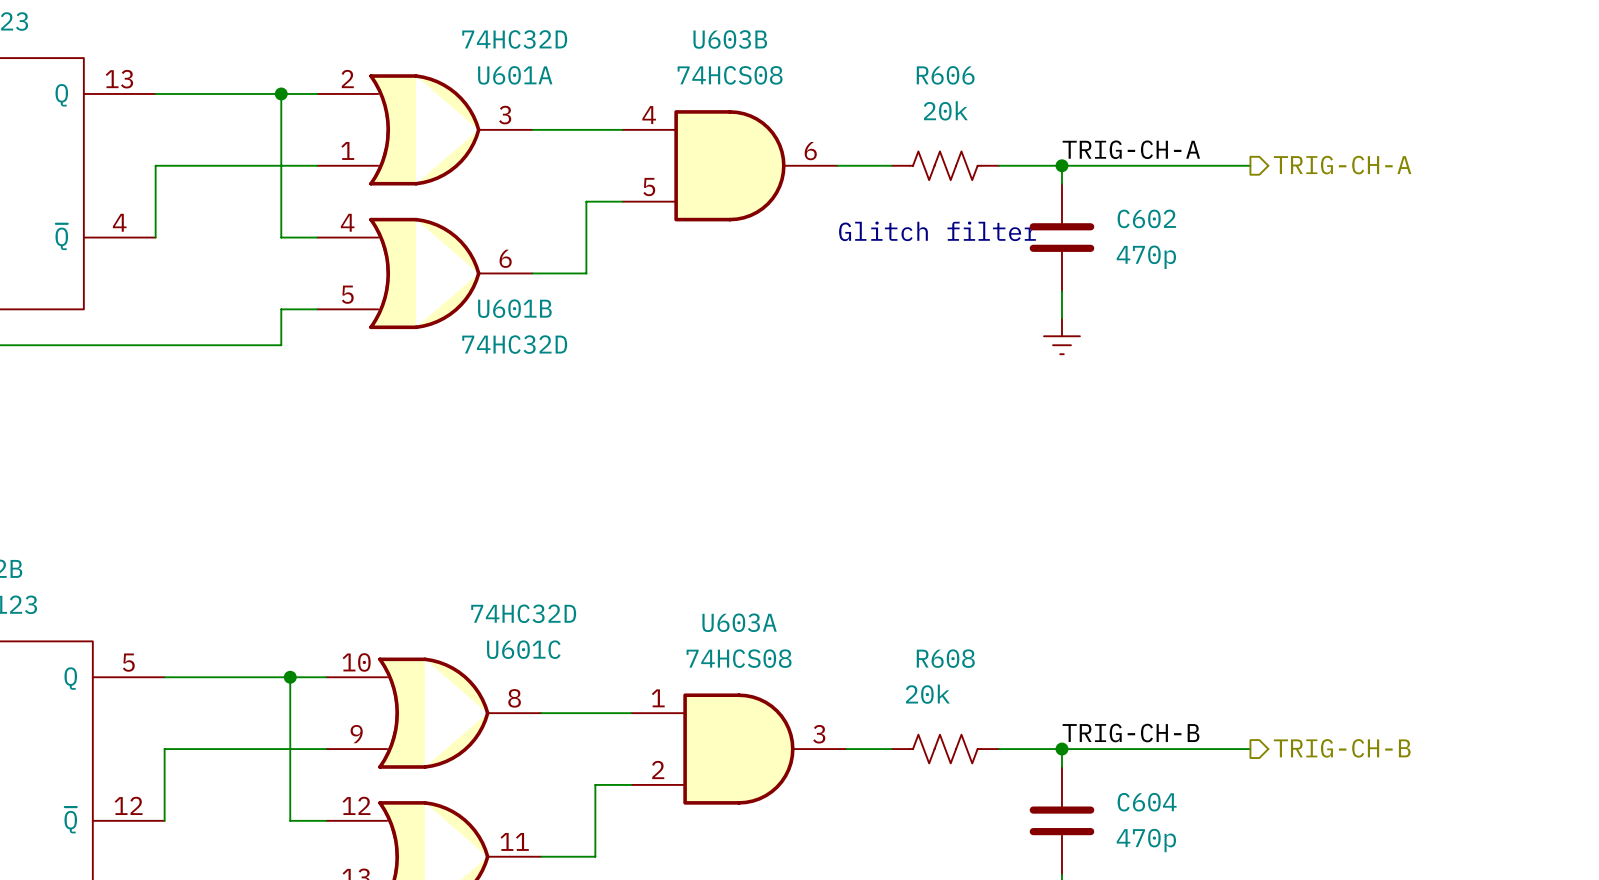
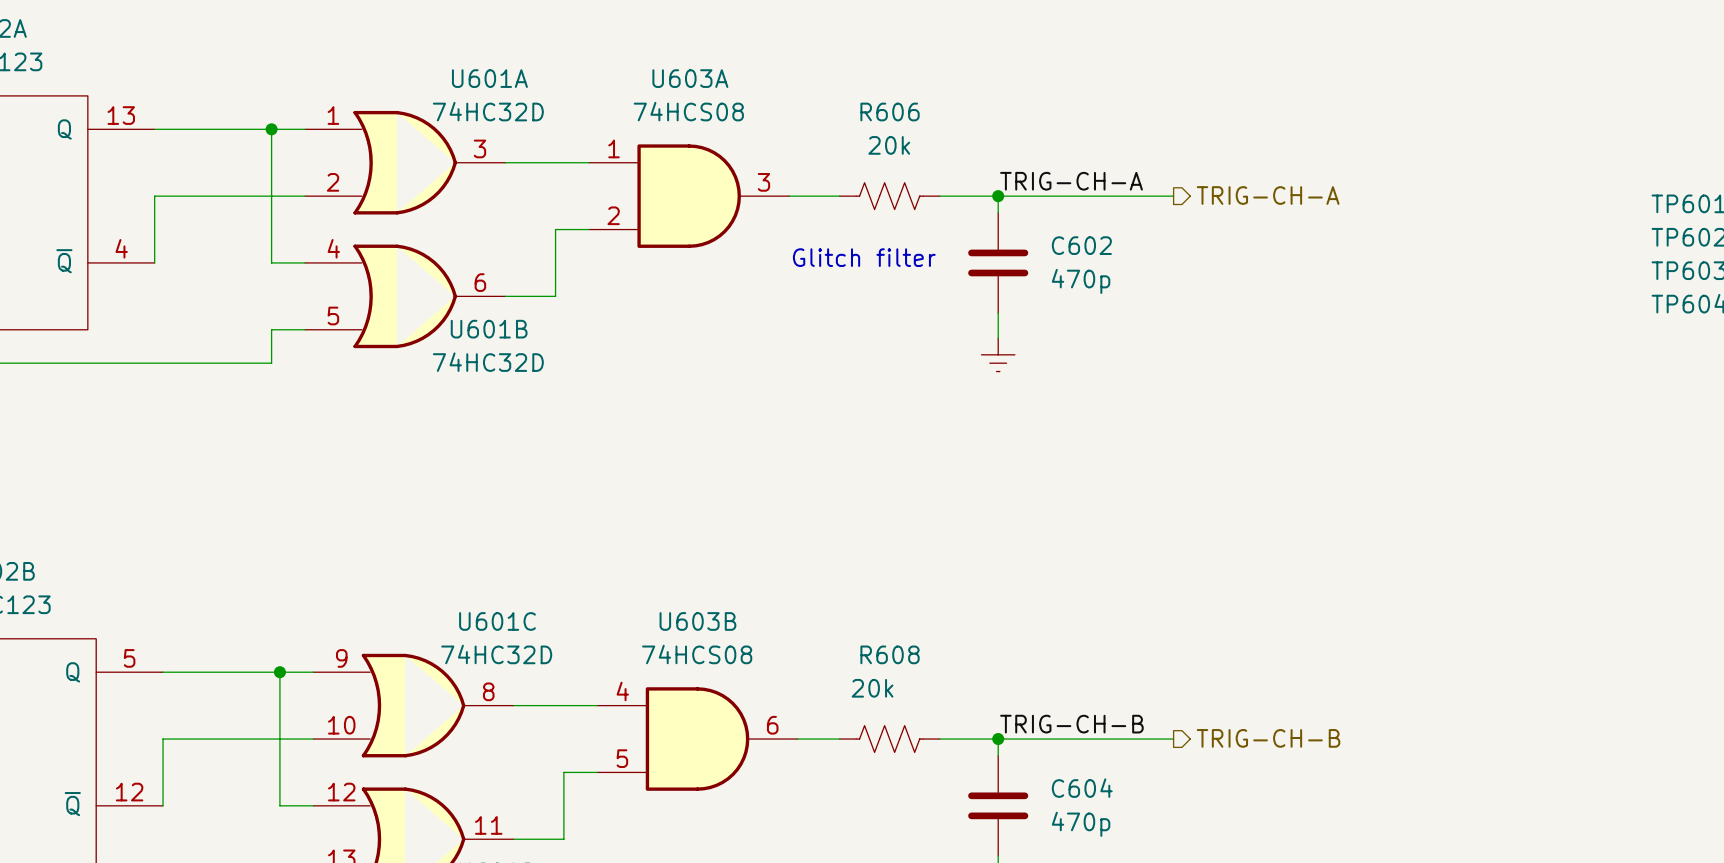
U601A value position: 74HC32D (514, 39) -> 74HC32D (488, 111)
U601A name position: U601A (515, 75) -> U601A (489, 78)
U601A flip: as is (424, 129) -> up-down (405, 162)
U603B position: (729, 165) -> (697, 739)
U601C value position: 74HC32D (523, 613) -> 74HC32D (496, 654)
U601C flip: as is (433, 713) -> up-down (413, 705)
U603A position: (738, 749) -> (689, 196)

